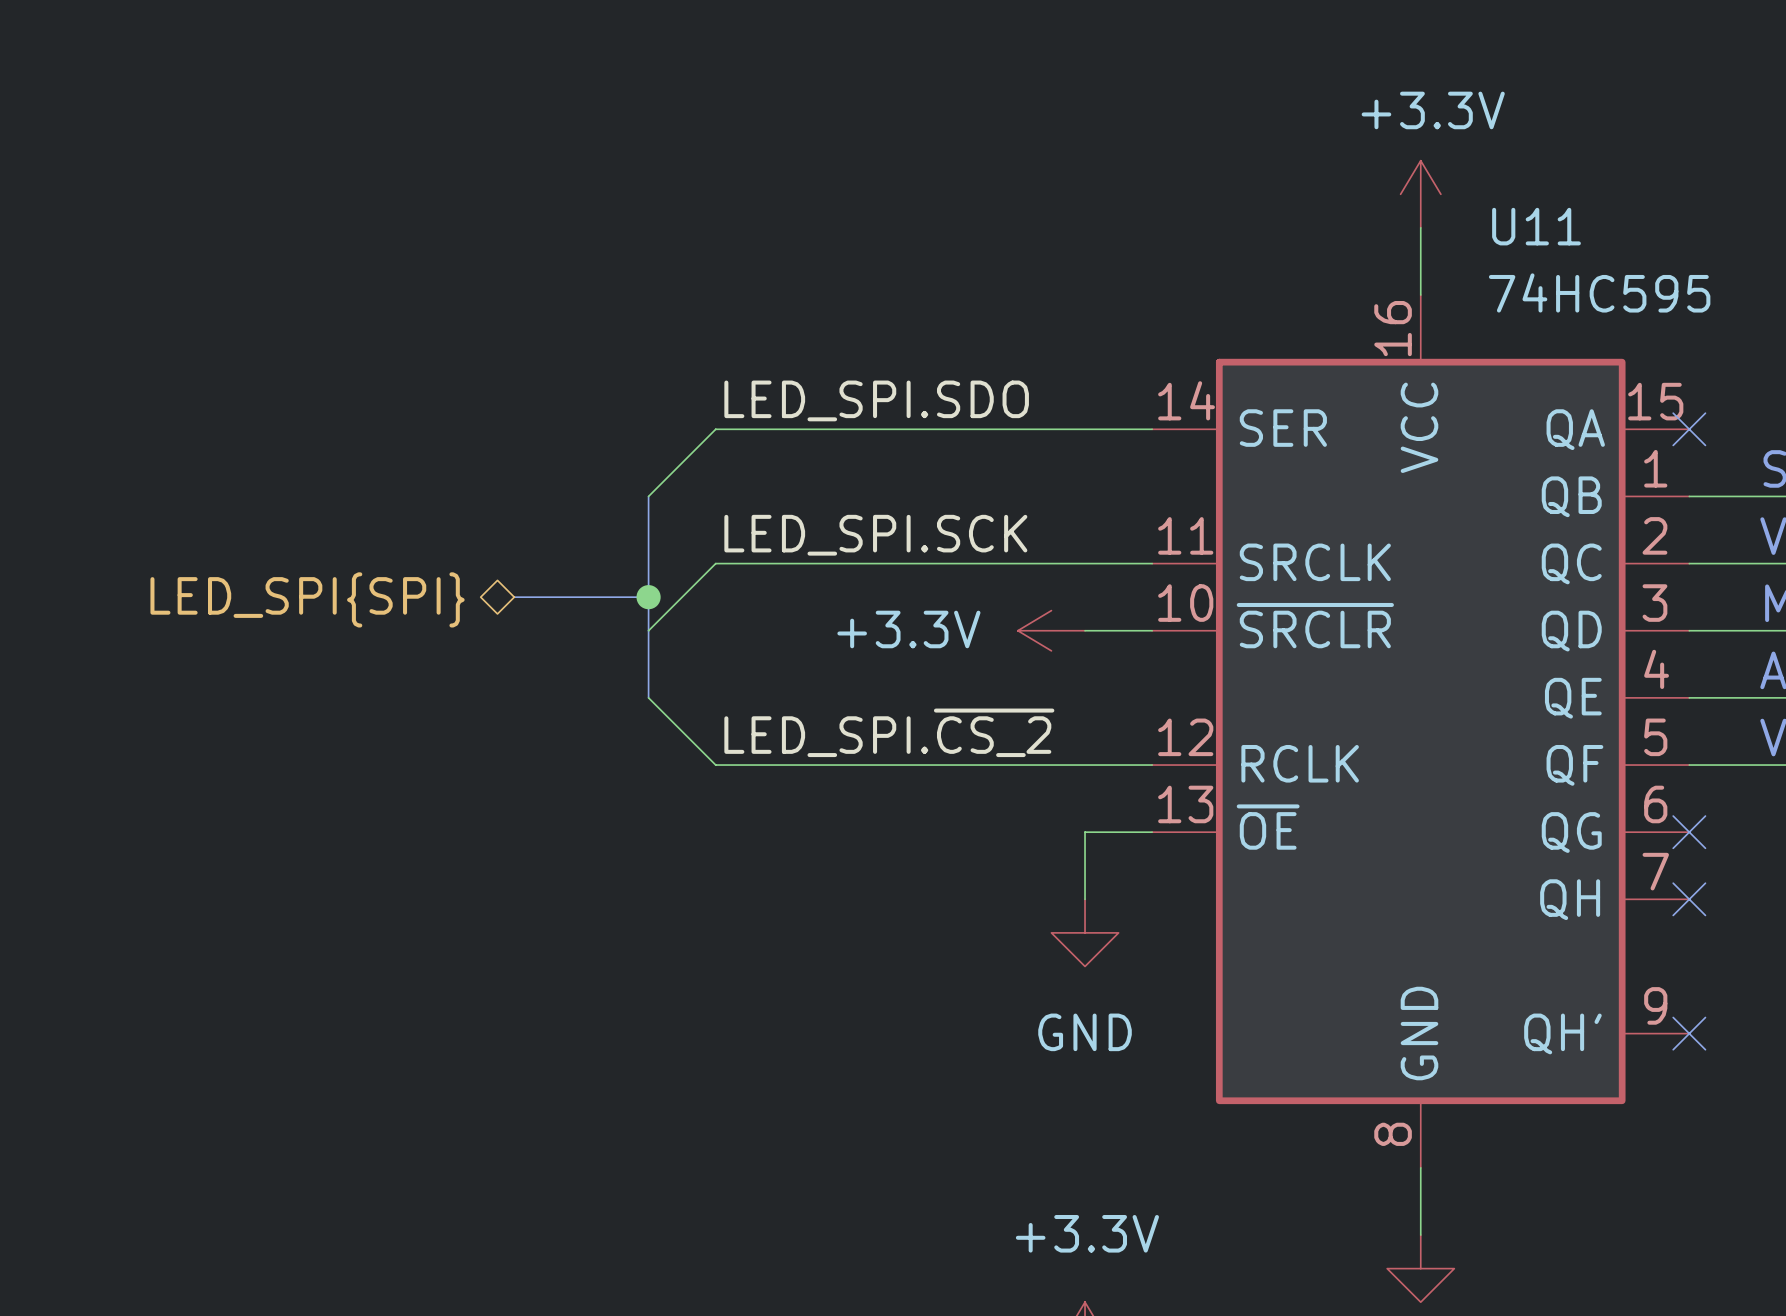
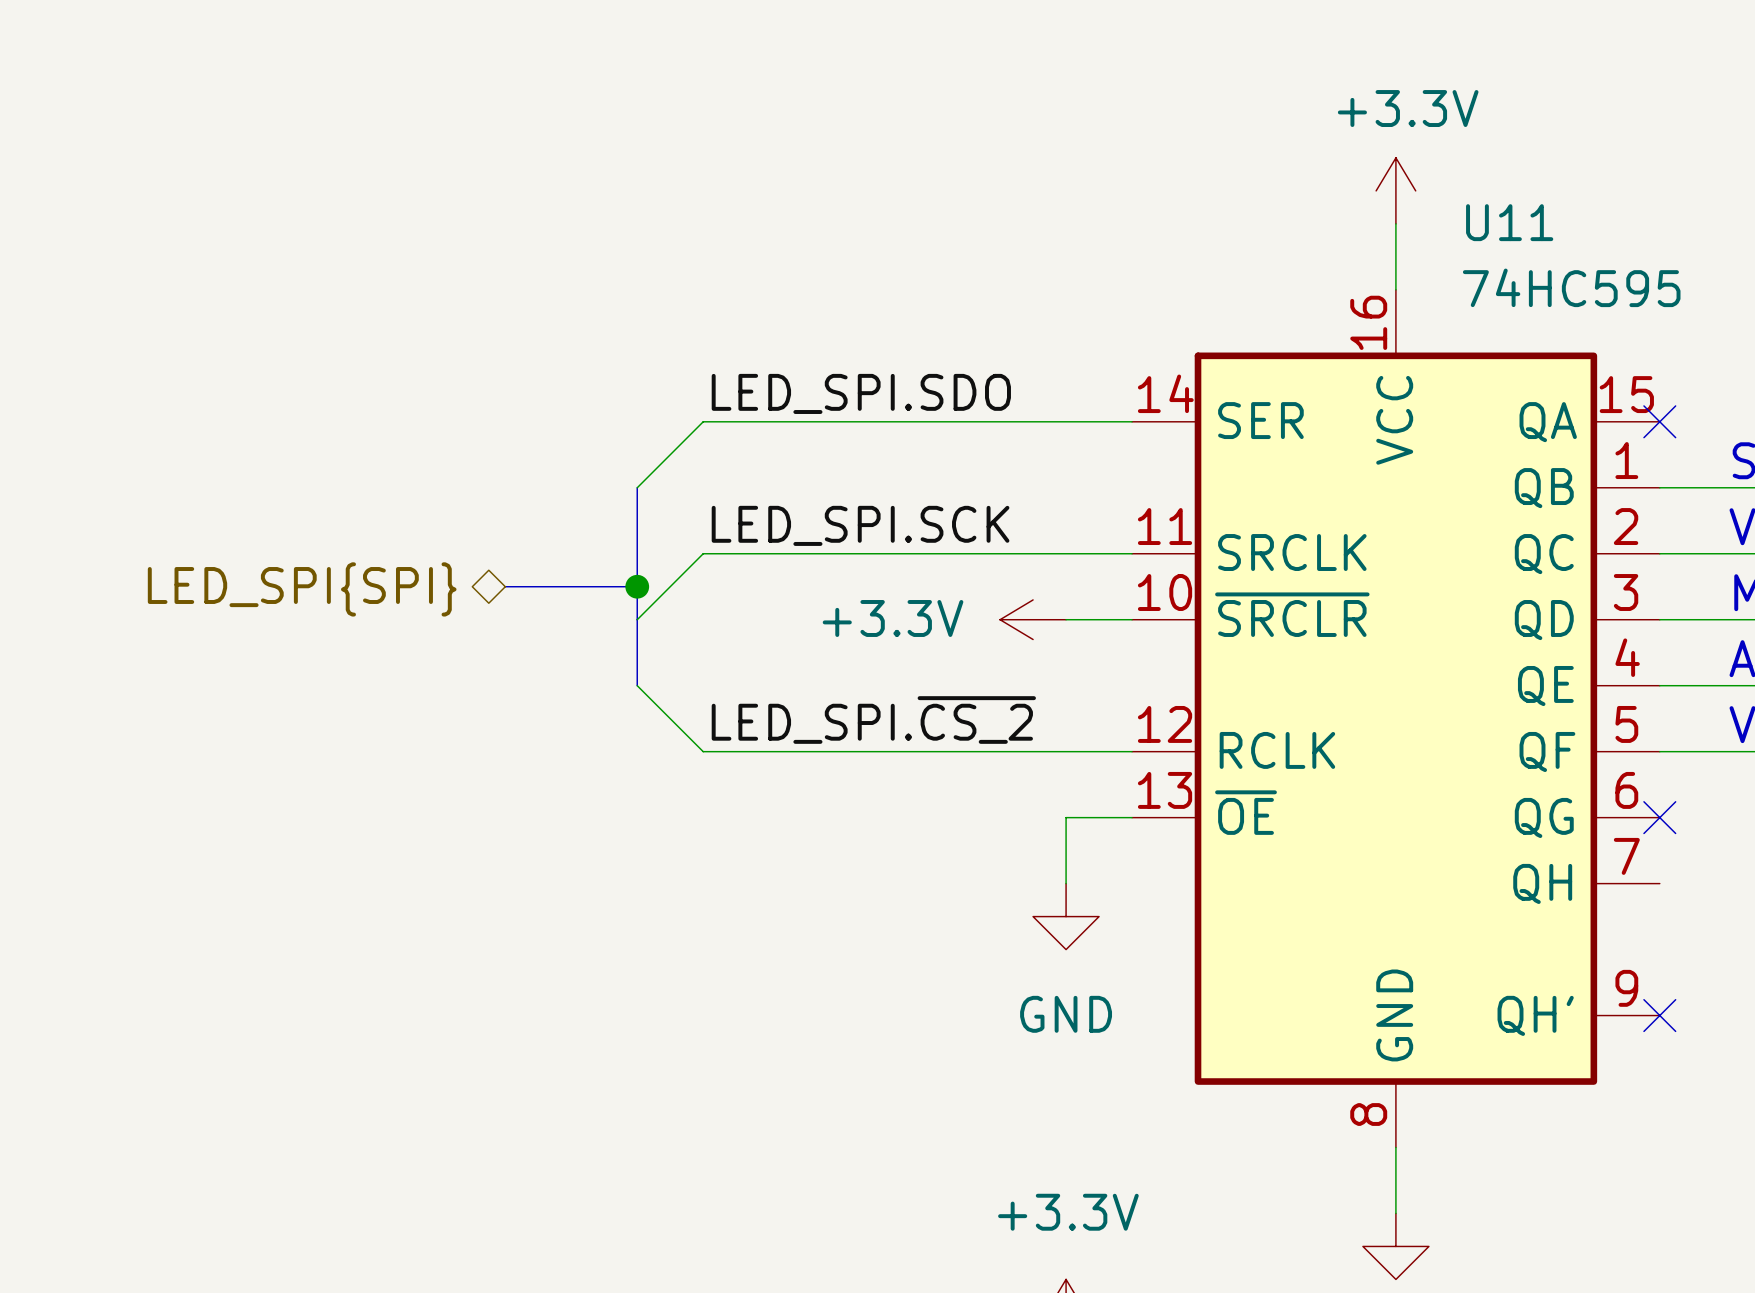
no-connect mark: (1689, 899) -> none

